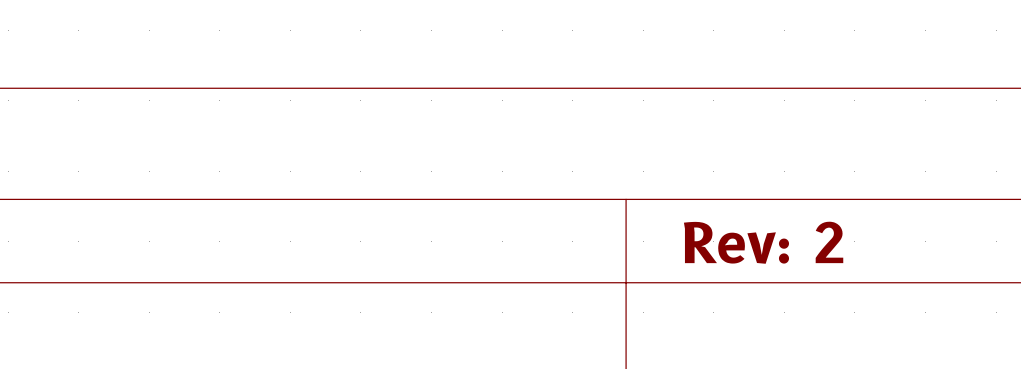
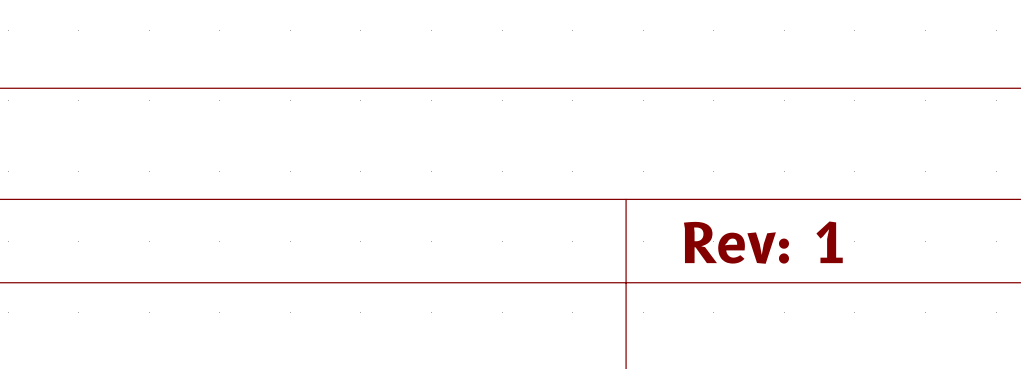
title block: Rev: 2 (763, 242) -> Rev: 1 (763, 242)

